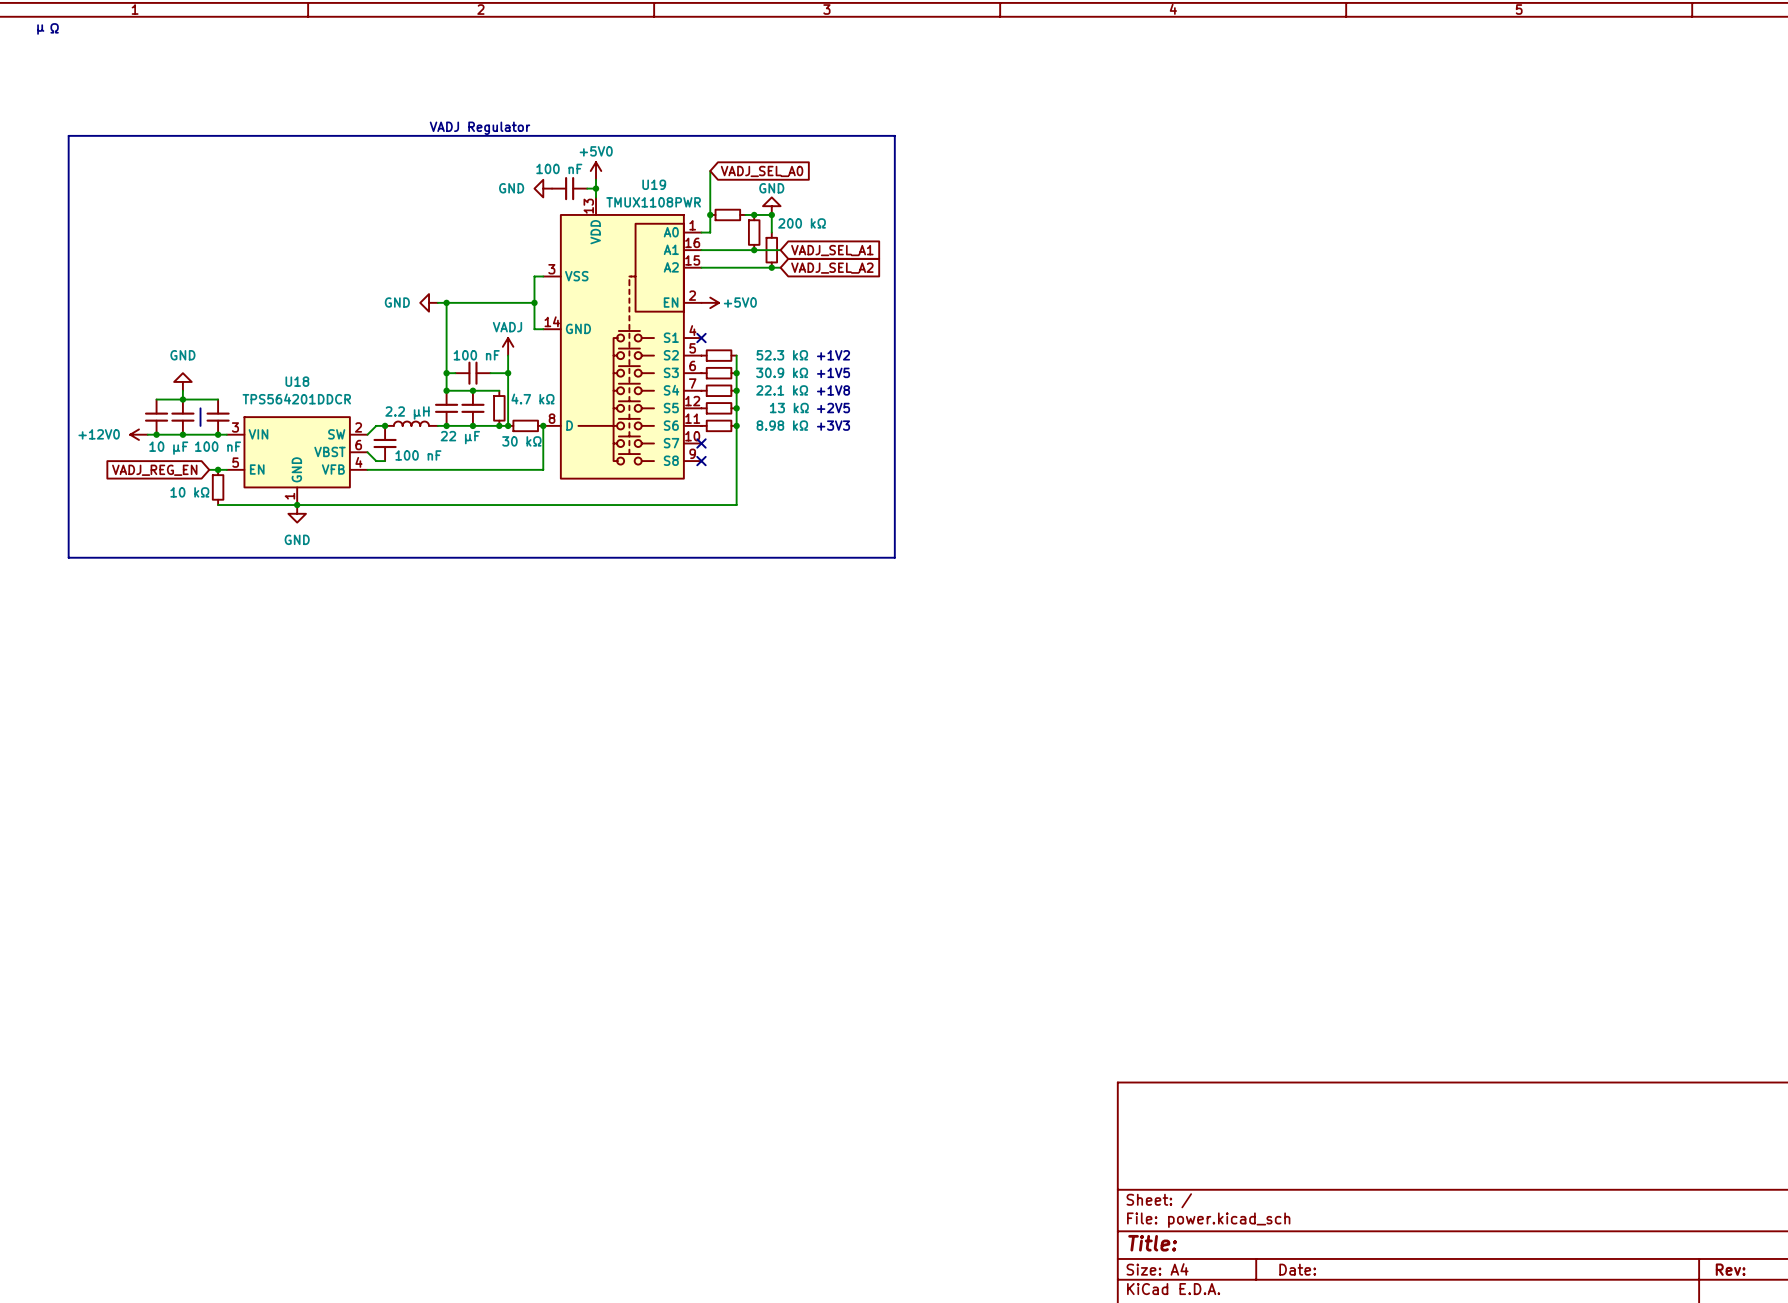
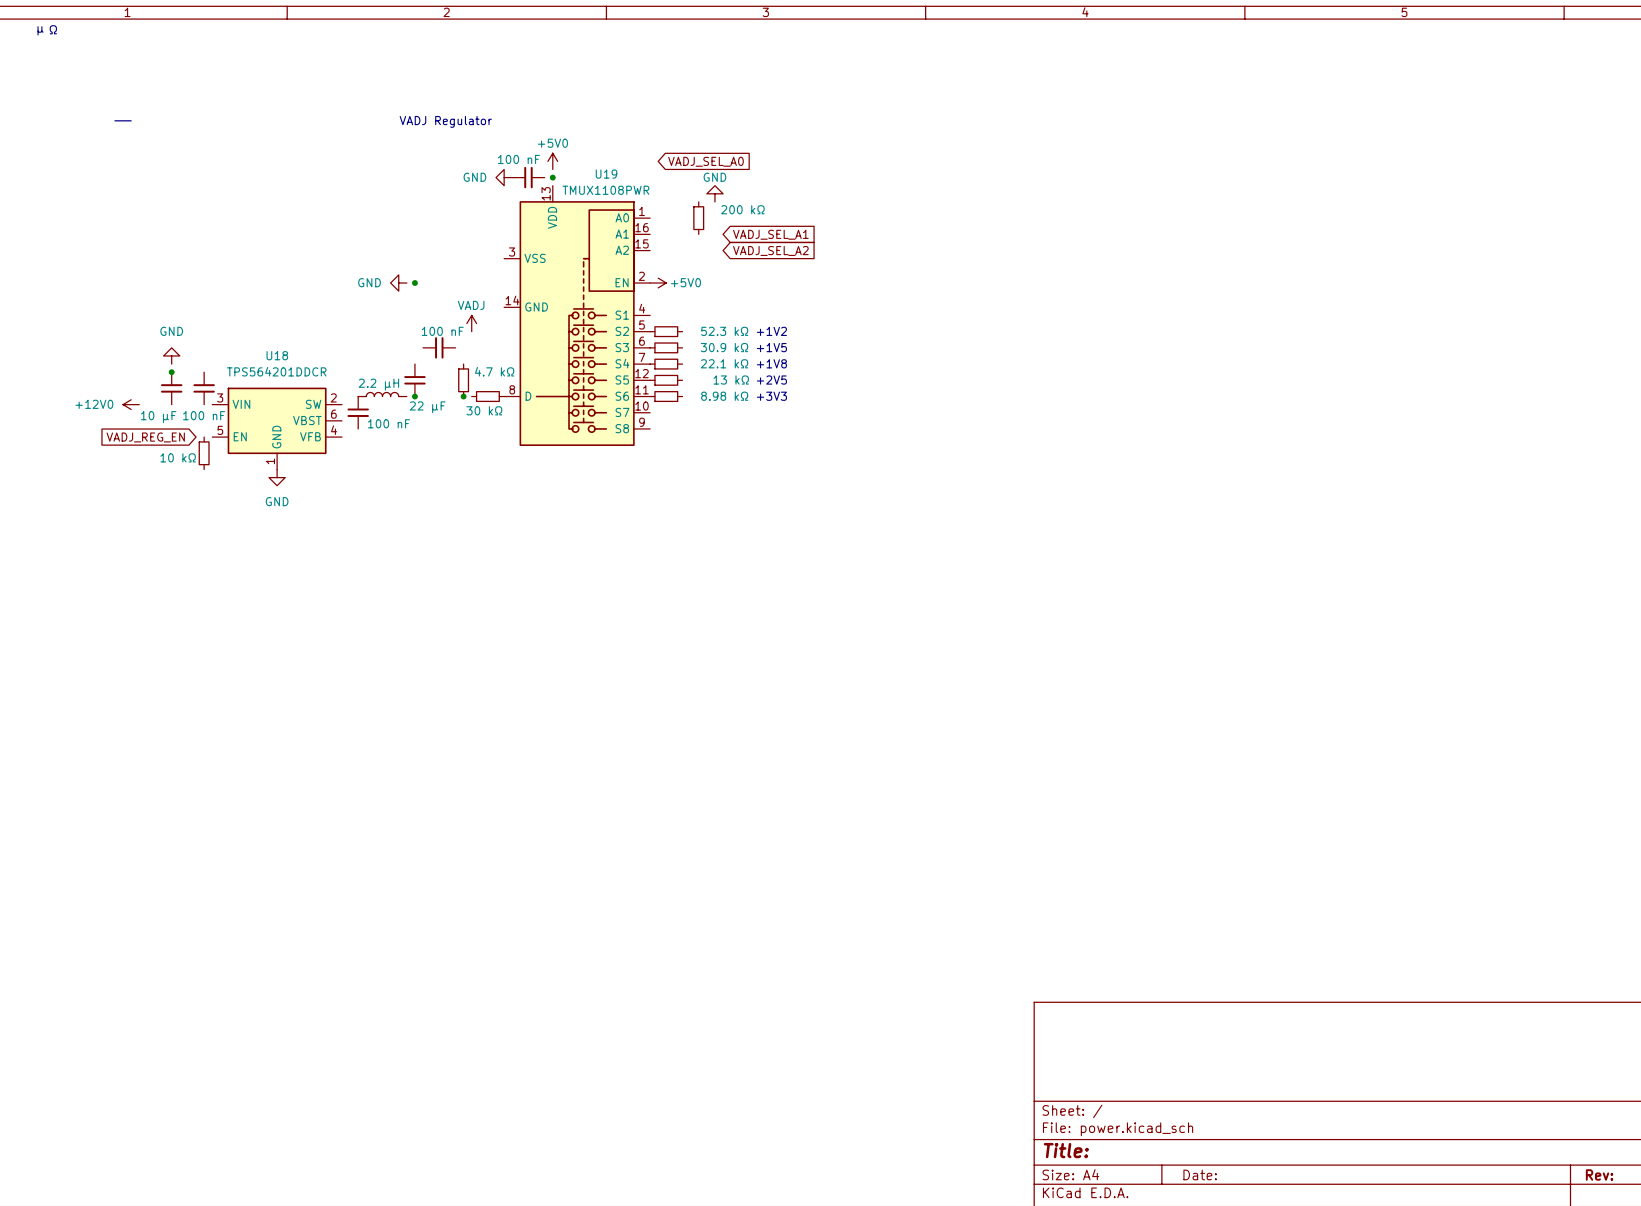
bus: none -> (114, 120) (131, 120)
line: (68, 135) (894, 135) (894, 557) (68, 557) (68, 135) -> none
wire: (710, 171) (710, 232) (701, 232) -> none
wire: (596, 179) (596, 197) -> none
wire: (587, 188) (596, 188) -> none
junction: (710, 214) -> none
part: (727, 214) -> none
wire: (745, 214) (771, 214) (771, 232) -> none
junction: (754, 214) -> none
junction: (771, 214) -> none
wire: (701, 250) (780, 250) -> none
junction: (754, 250) -> none
part: (771, 250) -> none
wire: (701, 267) (780, 267) -> none
junction: (771, 267) -> none
wire: (543, 276) (534, 276) (534, 329) (543, 329) -> none
wire: (437, 302) (534, 302) -> none
wire: (446, 302) (446, 390) (499, 390) -> none
junction: (534, 302) -> none
no-connect mark: (701, 338) -> none
wire: (508, 355) (508, 425) (437, 425) -> none
wire: (736, 355) (736, 505) (218, 505) -> none
wire: (446, 373) (455, 373) -> none
junction: (446, 373) -> none
wire: (490, 373) (508, 373) -> none
junction: (508, 373) -> none
junction: (736, 373) -> none
wire: (182, 390) (182, 399) -> none
junction: (446, 390) -> none
junction: (472, 390) -> none
junction: (736, 390) -> none
wire: (156, 399) (218, 399) -> none
line: (200, 408) (200, 425) -> none
part: (472, 408) -> none
junction: (736, 408) -> none
part: (156, 417) -> none
wire: (385, 425) (376, 425) (367, 434) -> none
junction: (385, 425) -> none
junction: (472, 425) -> none
junction: (508, 425) -> none
wire: (543, 425) (543, 469) (367, 469) -> none
junction: (543, 425) -> none
junction: (736, 425) -> none
wire: (147, 434) (226, 434) -> none
junction: (156, 434) -> none
junction: (182, 434) -> none
junction: (218, 434) -> none
no-connect mark: (701, 443) -> none
wire: (367, 452) (376, 461) (385, 461) -> none
no-connect mark: (701, 461) -> none
wire: (209, 469) (226, 469) -> none
junction: (218, 469) -> none
junction: (297, 505) -> none

